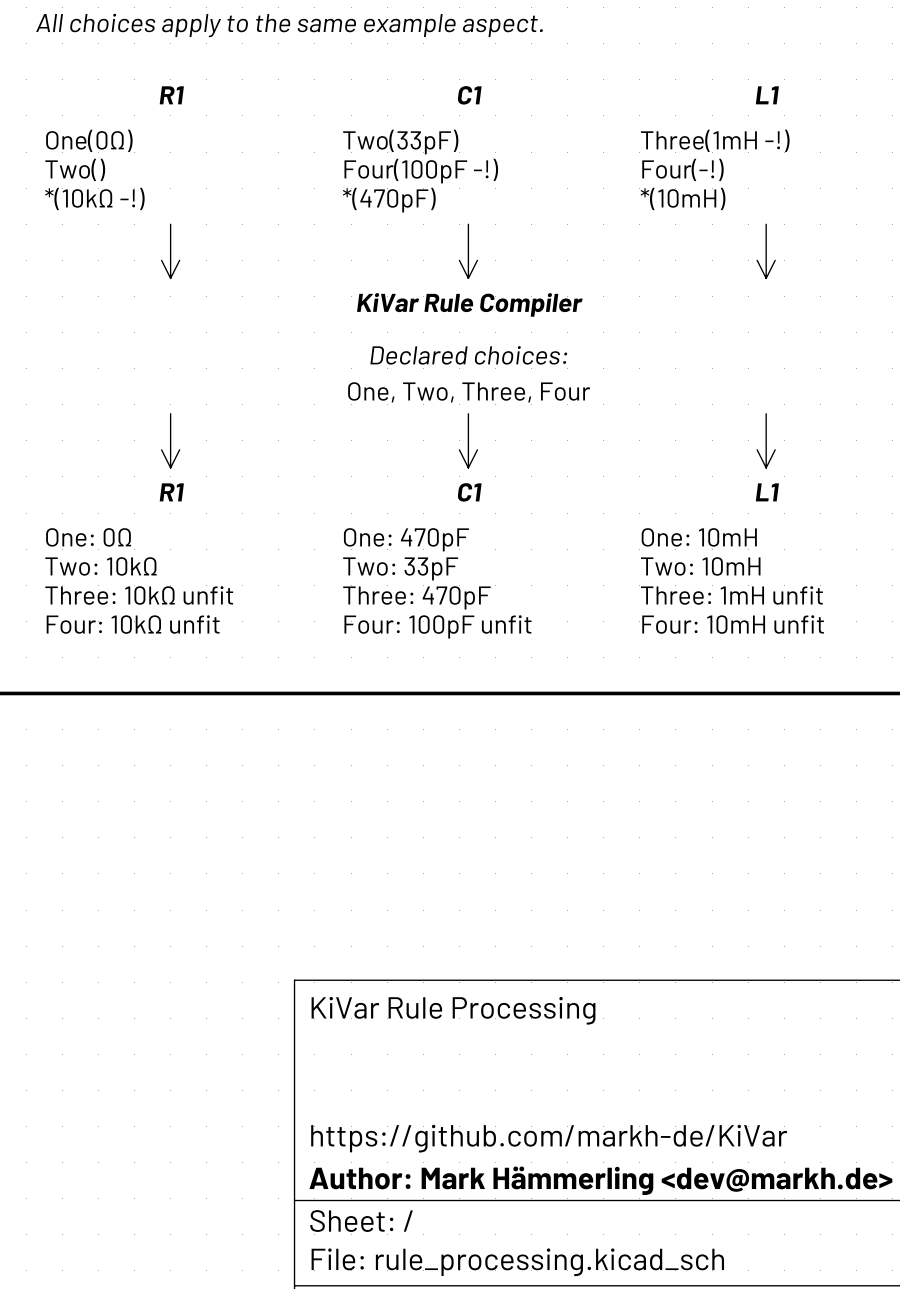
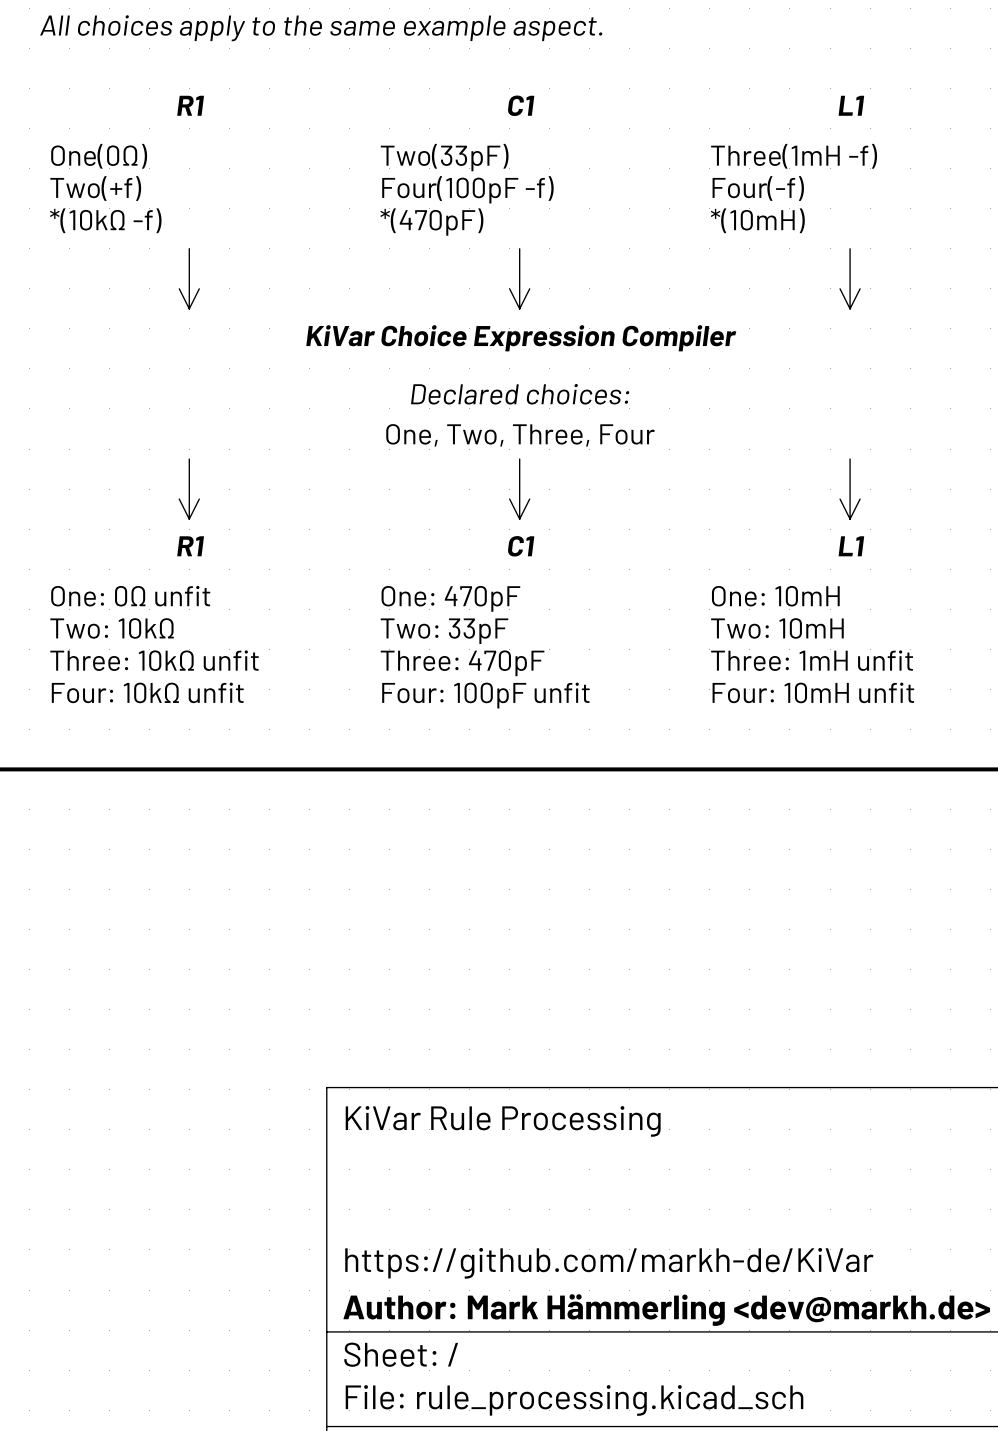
text: Three(1mH -!) (715, 140) -> Three(1mH -f) (794, 156)
text: Two() (75, 169) -> Two(+f) (95, 188)
text: Four(-!) (682, 169) -> Four(-f) (758, 188)
text: Four(100pF -!) (421, 171) -> Four(100pF -f) (467, 189)
text: *(10kΩ -!) (94, 198) -> *(10kΩ -f) (105, 220)
text: KiVar Rule Compiler (469, 304) -> KiVar Choice Expression Compiler (521, 338)
text: One: 0Ω (88, 537) -> One: 0Ω unfit (130, 596)

